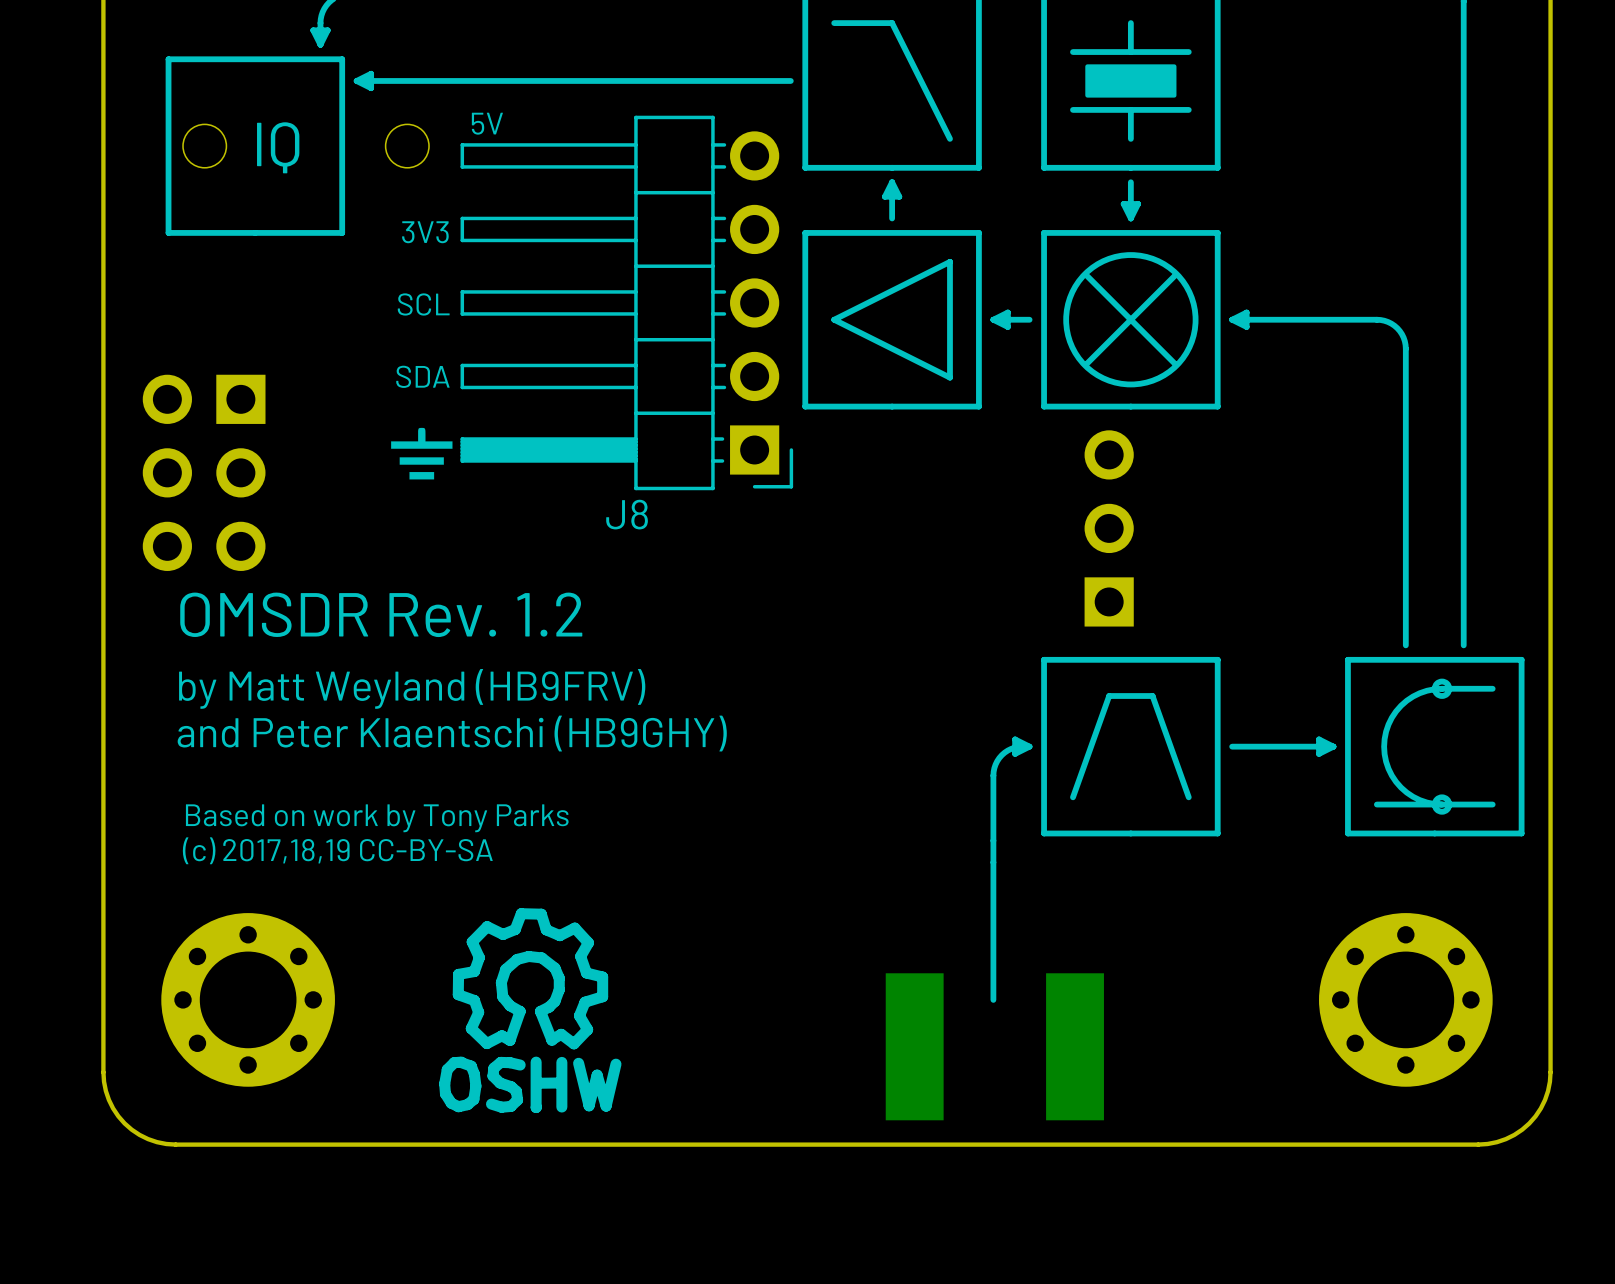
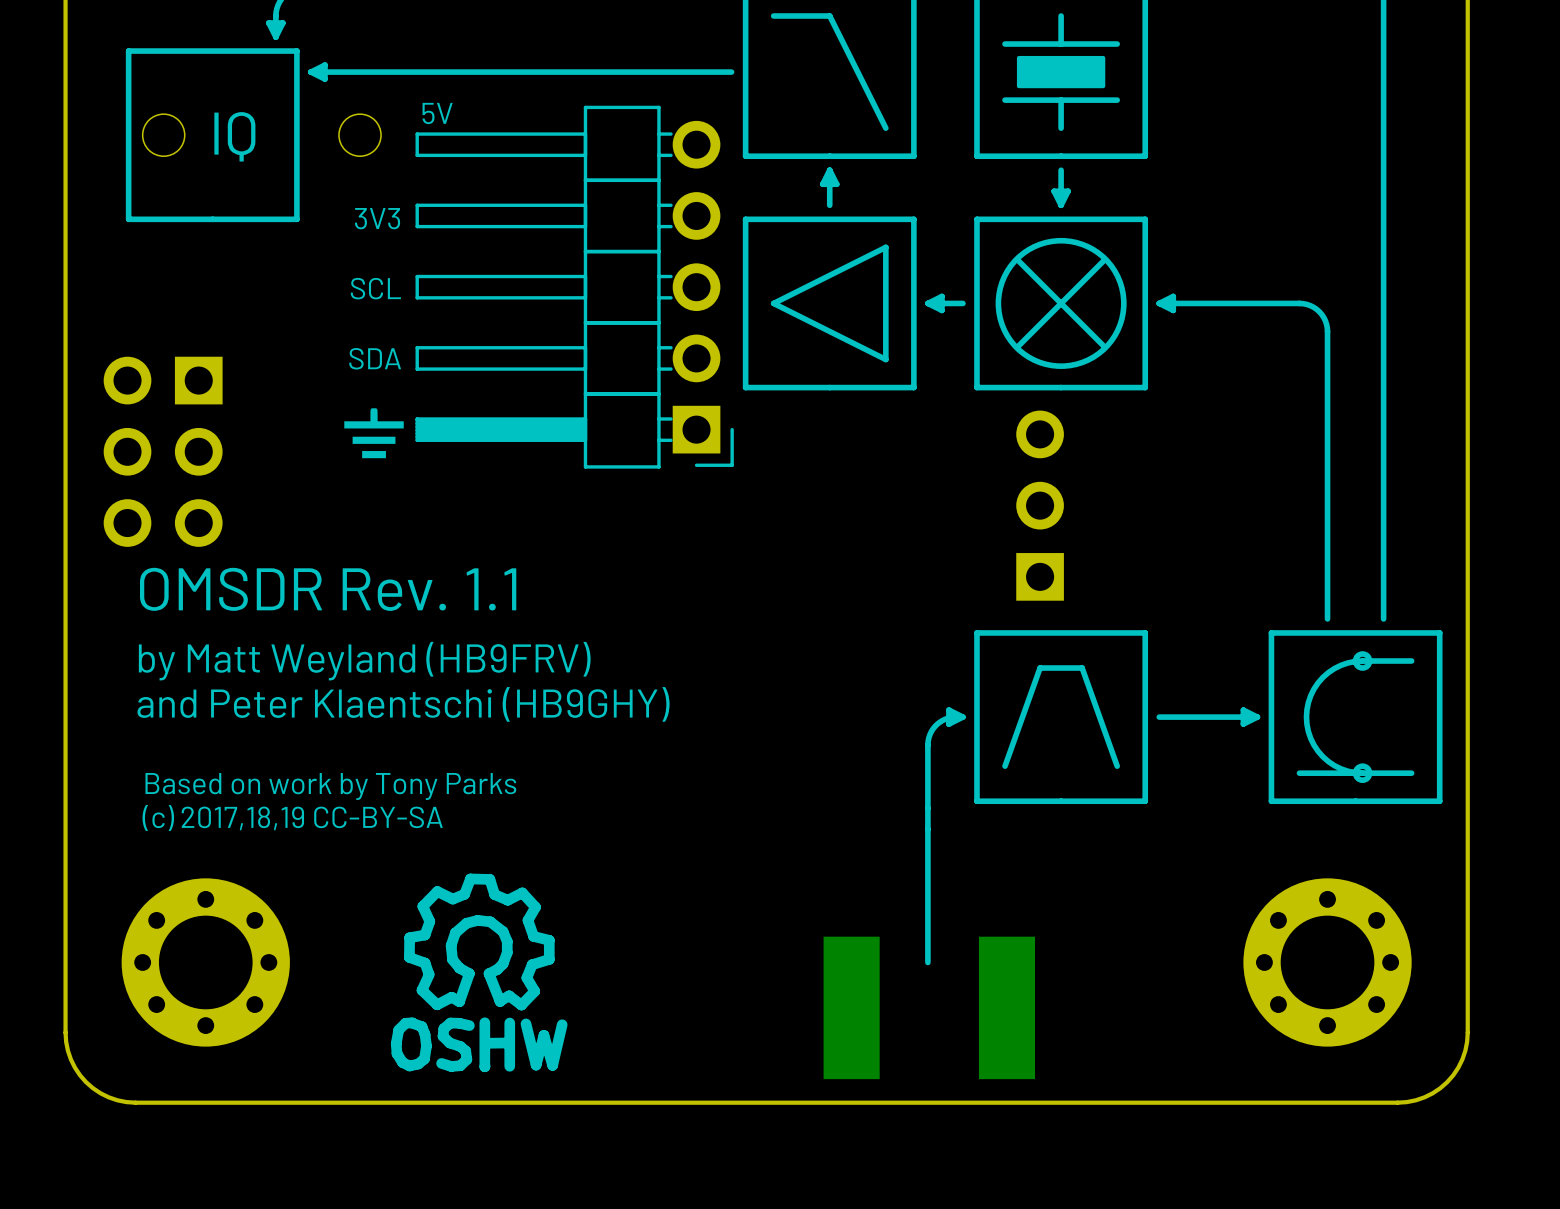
J8: (626, 302) -> none
part: none -> (574, 287)
text: OMSDR Rev. 1.2 (381, 614) -> OMSDR Rev. 1.1 (328, 589)

